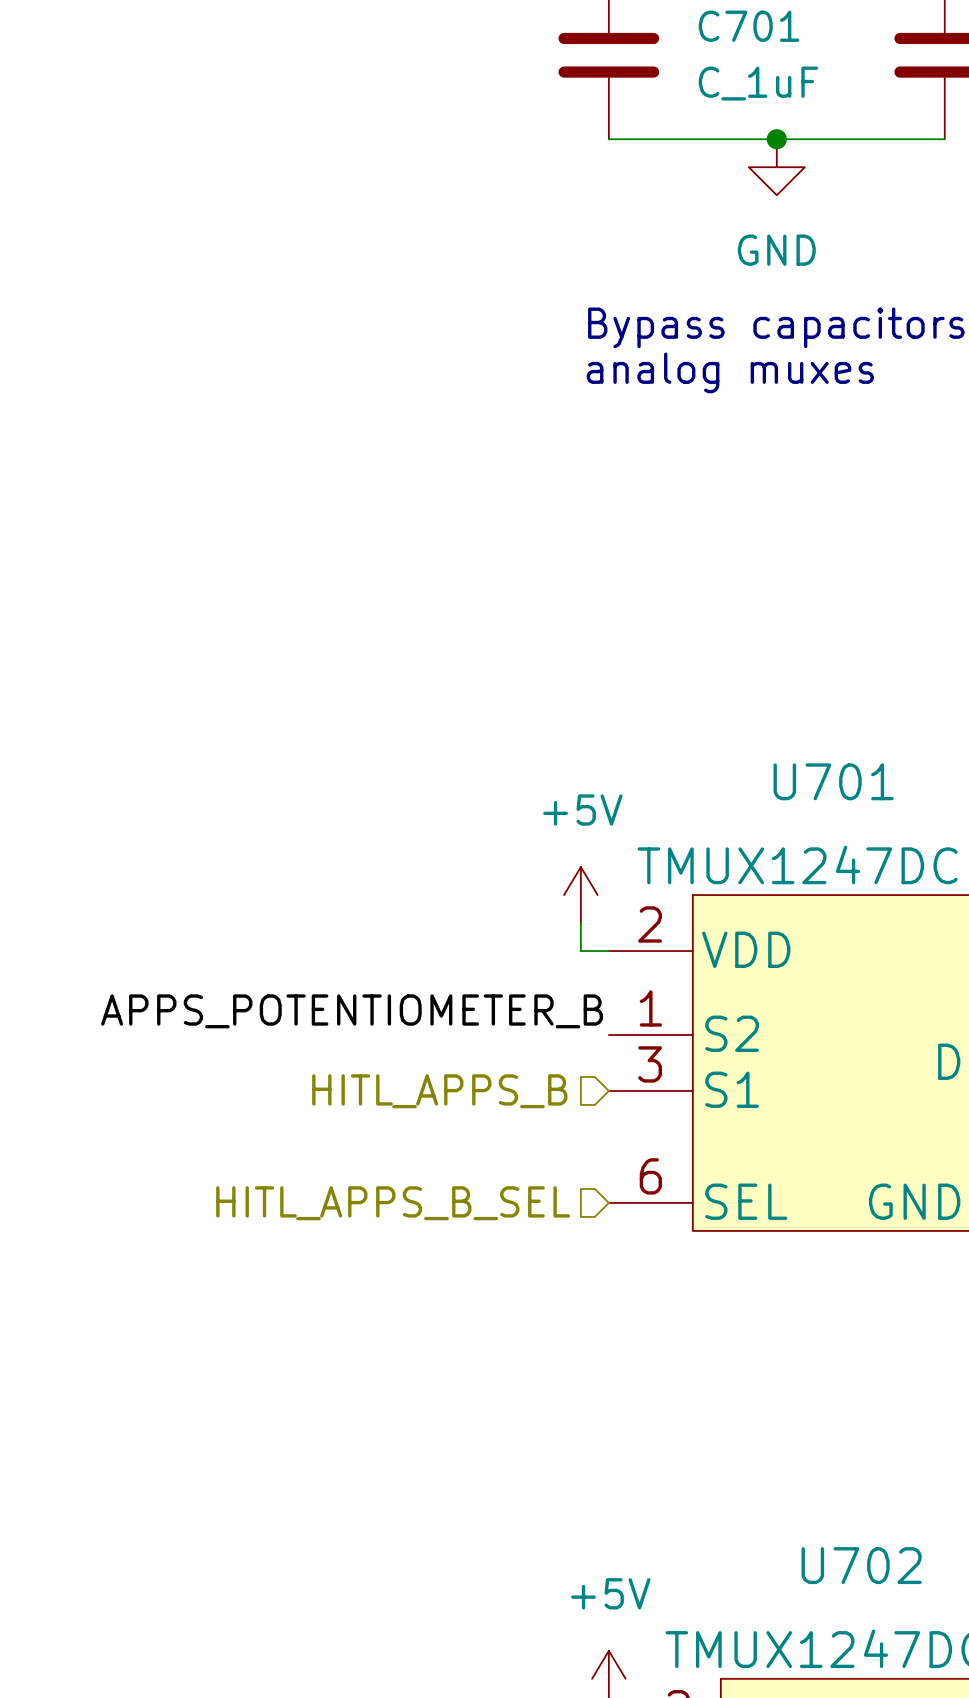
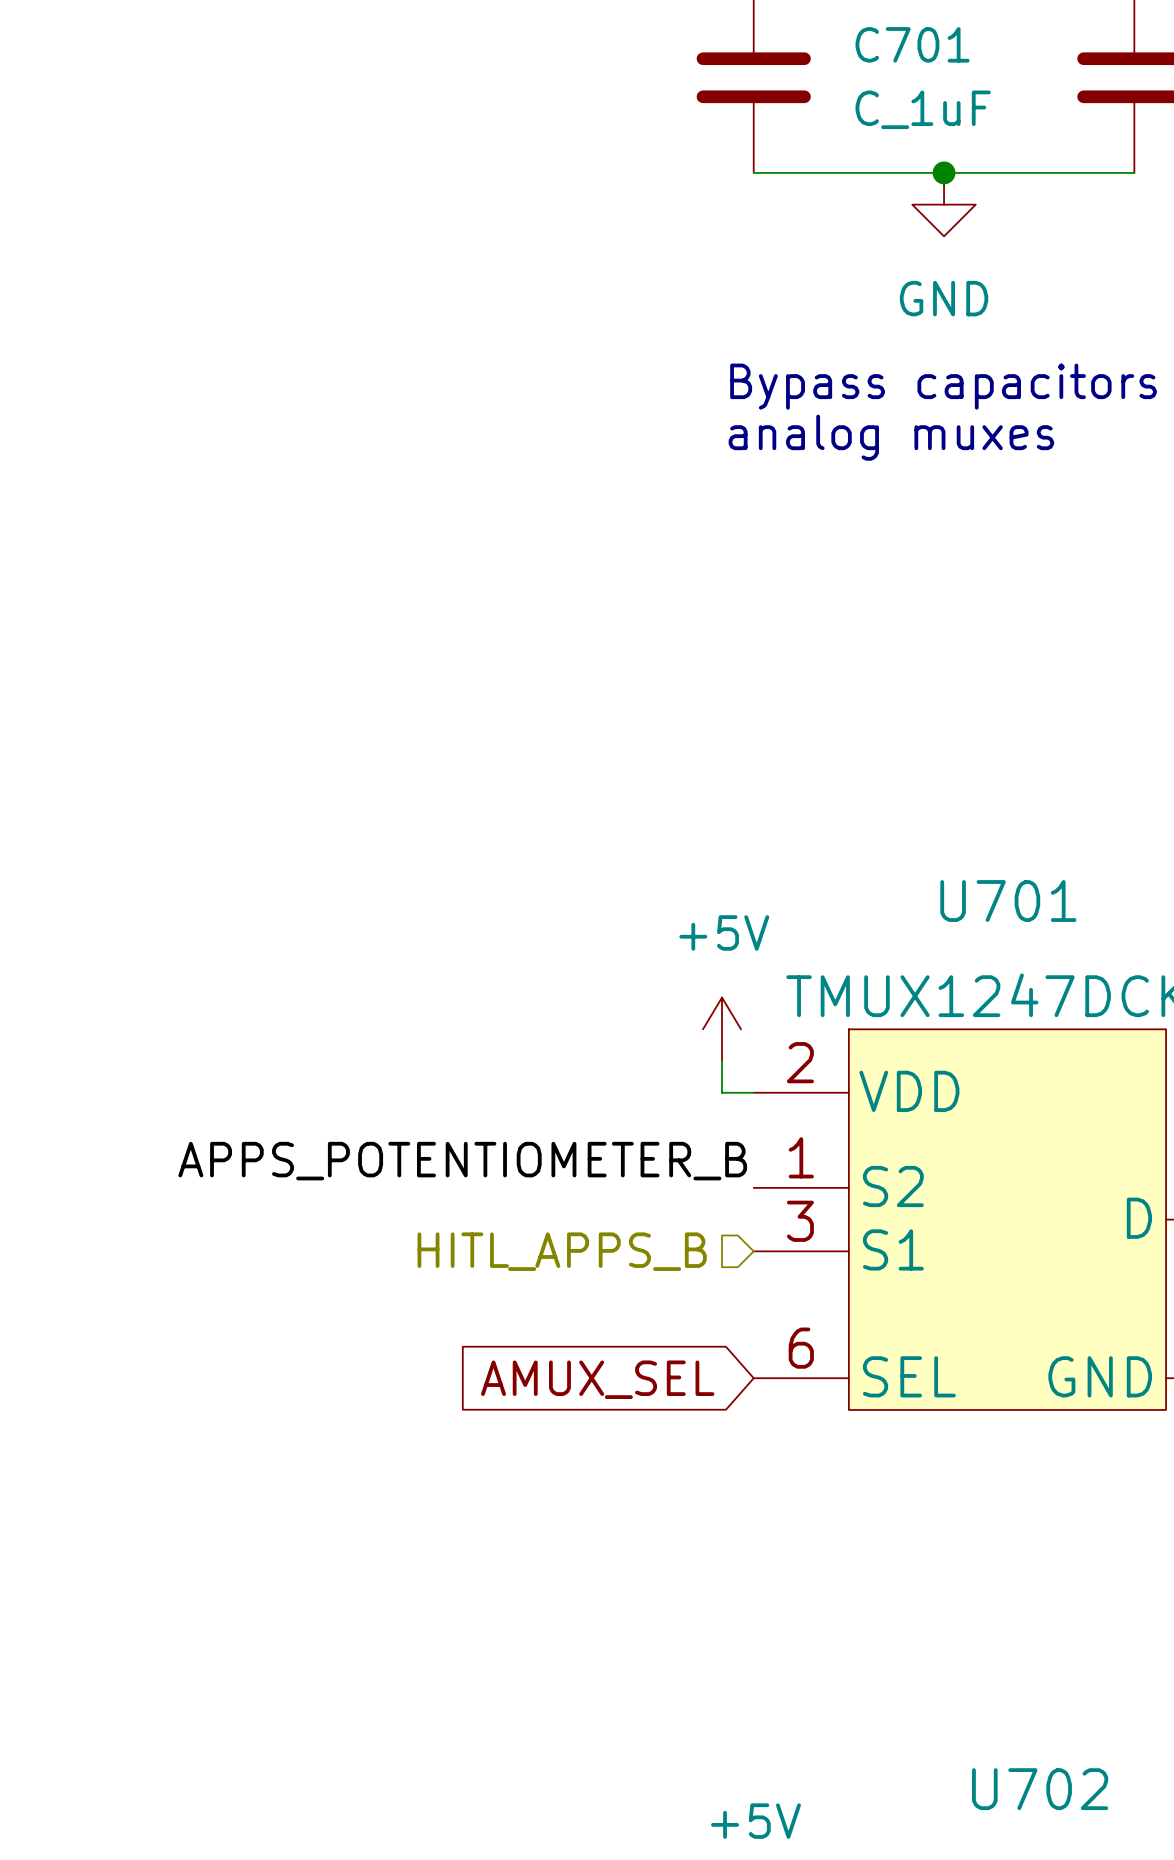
hierarchical label: HITL_APPS_B_SEL (393, 1203) -> none
global label: none -> AMUX_SEL (597, 1379)

